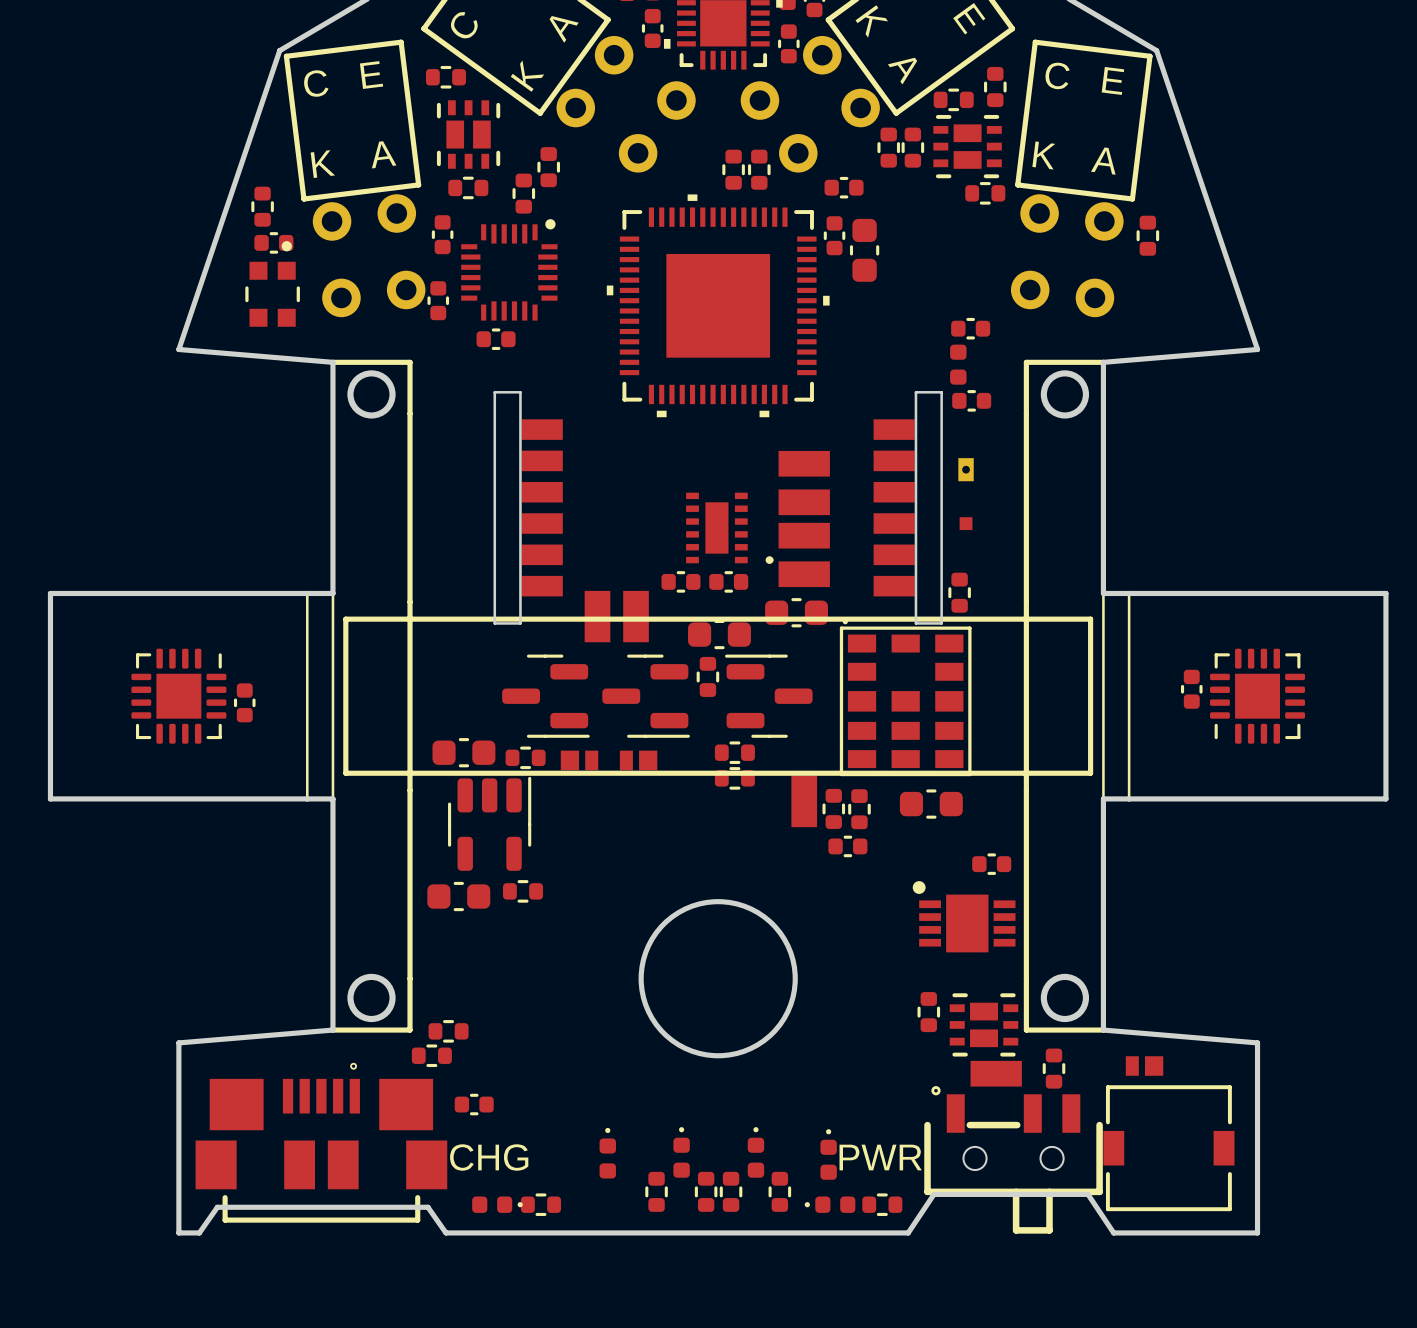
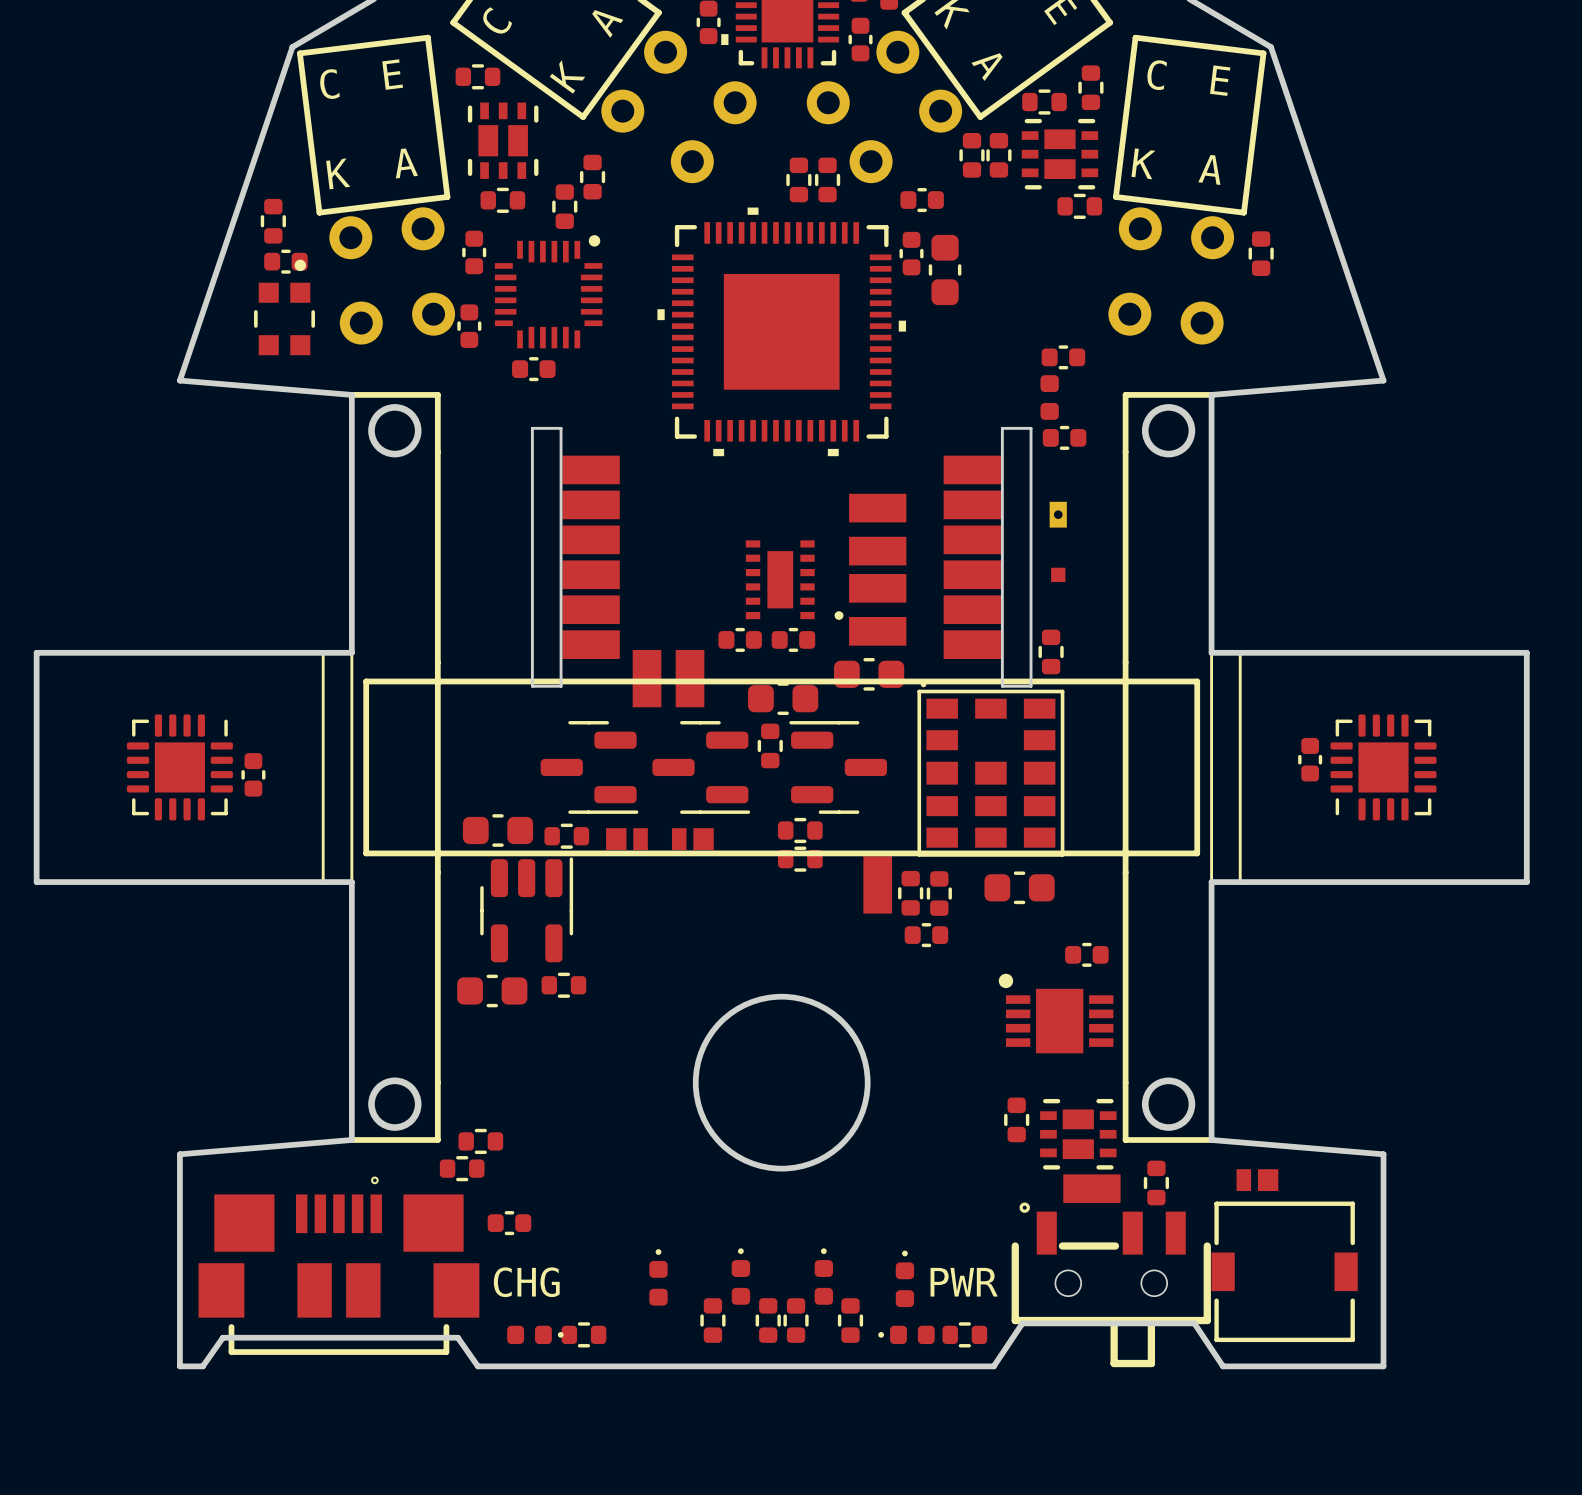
part footprint: [521, 419, 563, 597] -> [562, 455, 620, 659]
part footprint: [873, 419, 915, 597] -> [943, 455, 1001, 659]

